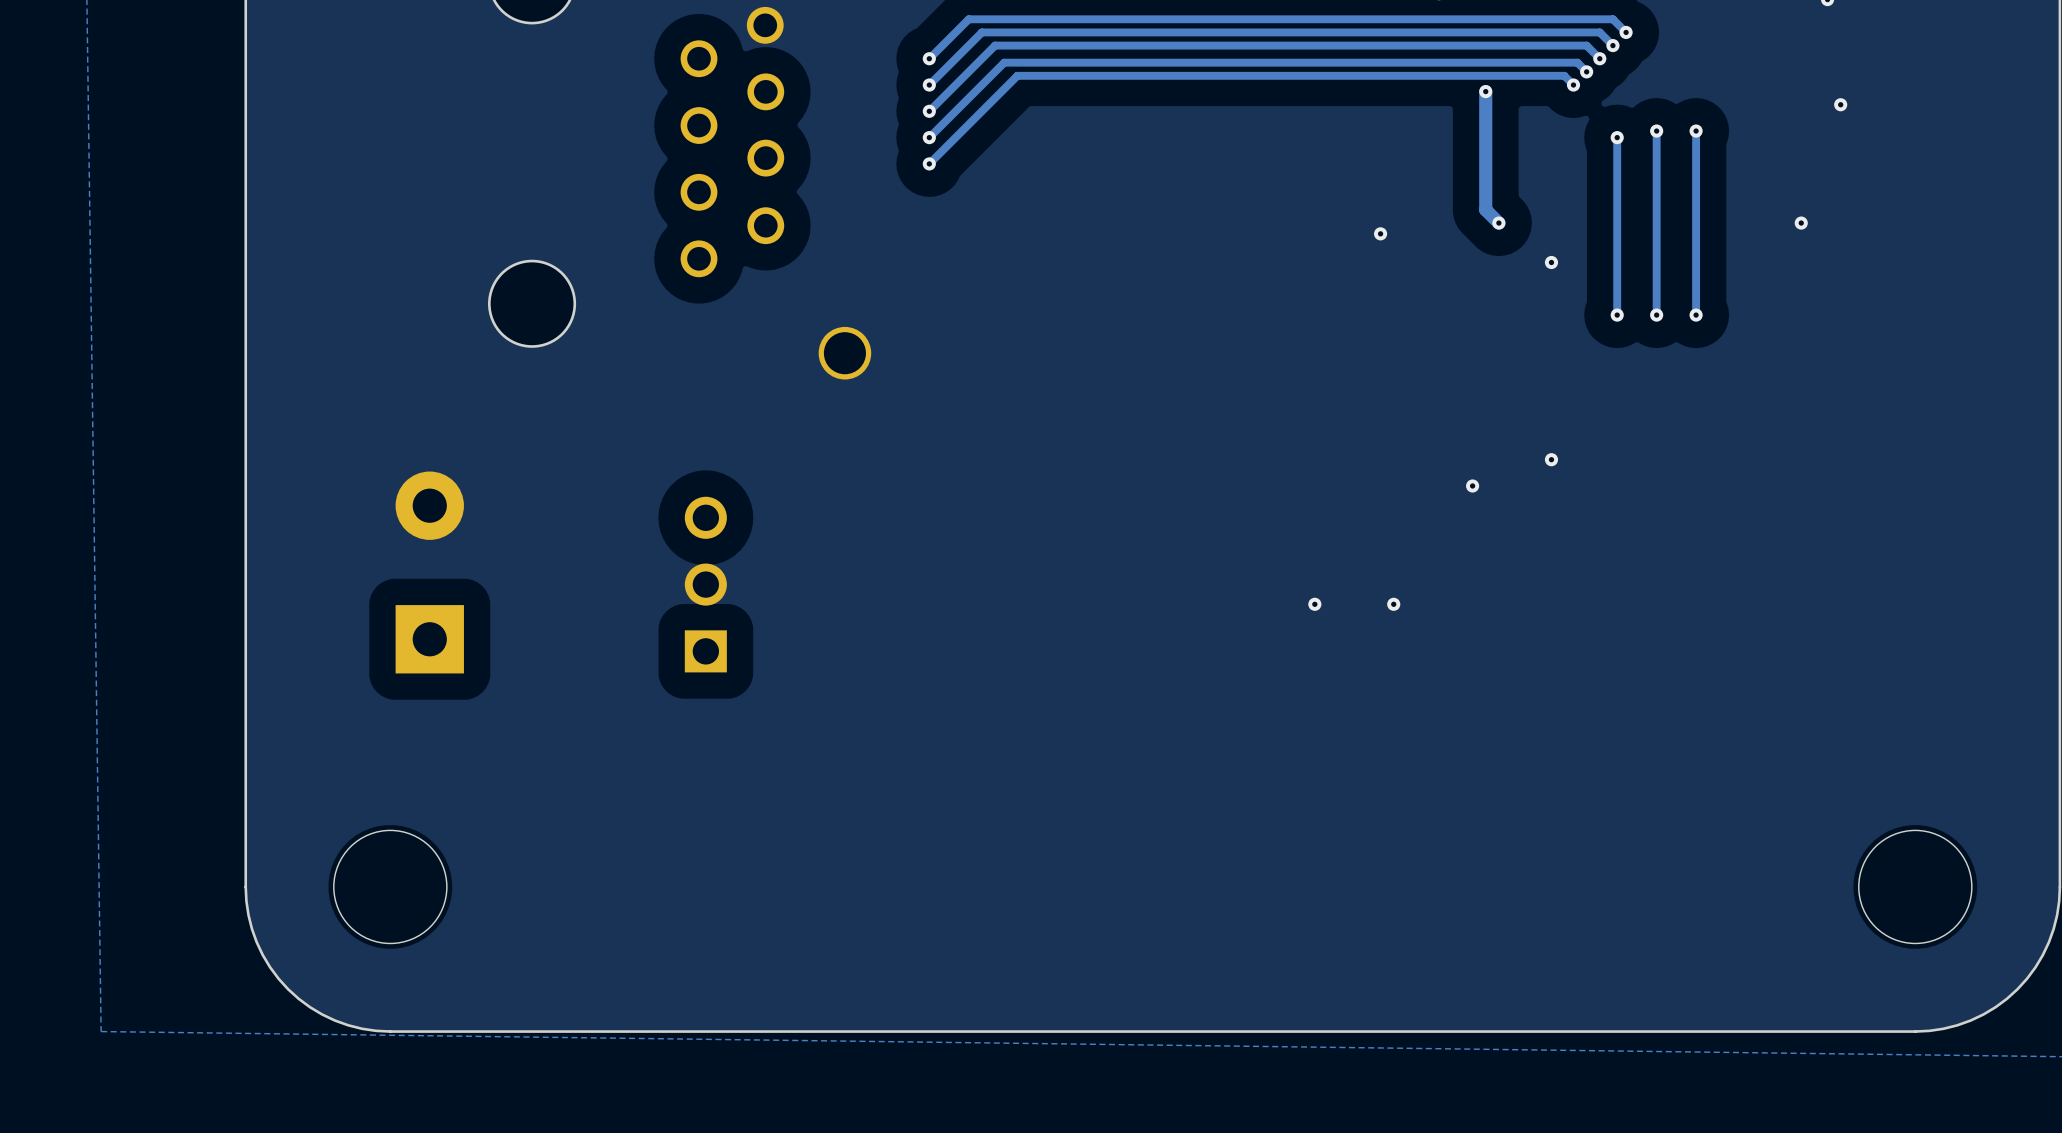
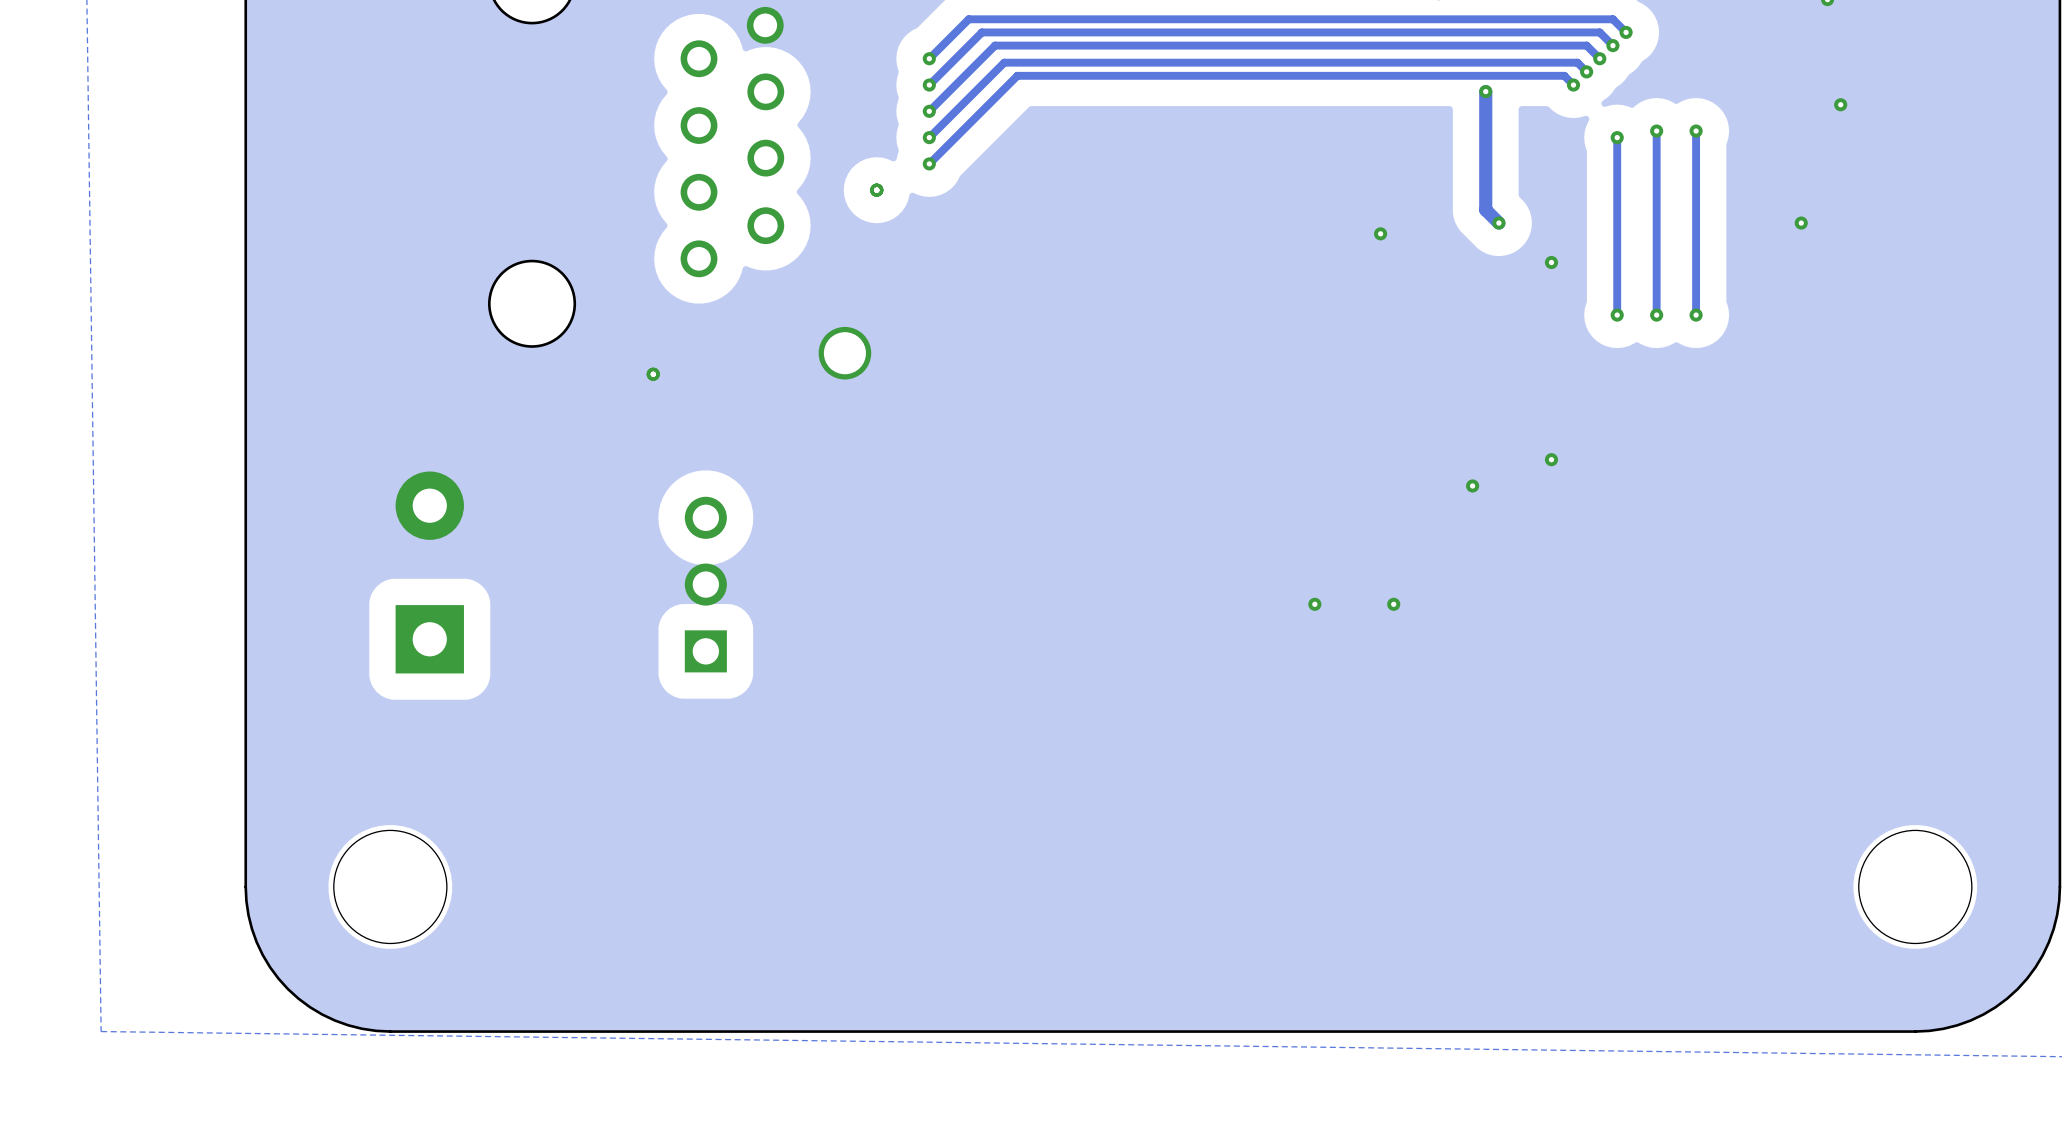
via: none -> (876, 190)
via: none -> (653, 374)

